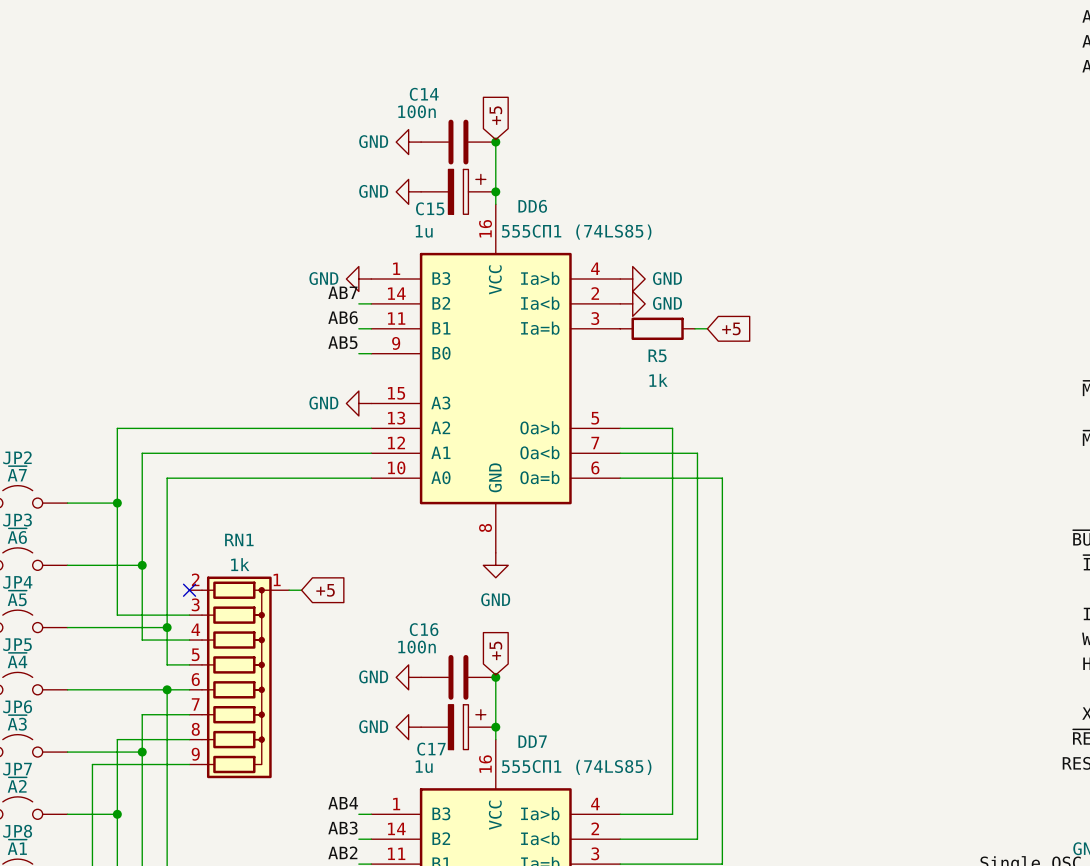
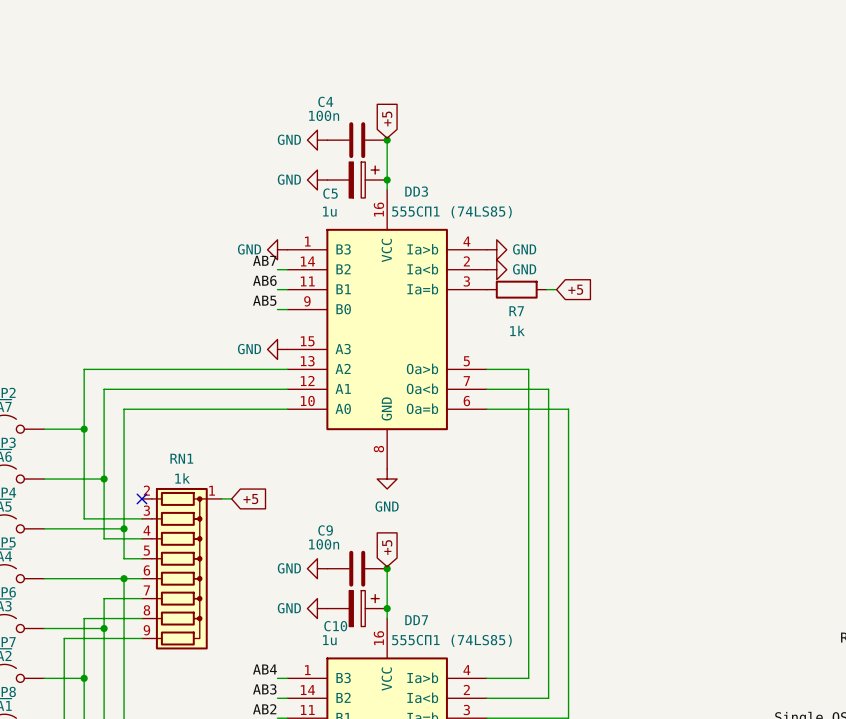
C14 name: C14 (424, 94) -> C4 (325, 101)
DD6 name: DD6 (532, 206) -> DD3 (416, 191)
C15 name: C15 (430, 208) -> C5 (330, 193)
R5 name: R5 (657, 355) -> R7 (516, 311)
C16 name: C16 (424, 629) -> C9 (325, 530)
C17 name: C17 (431, 749) -> C10 (335, 626)

